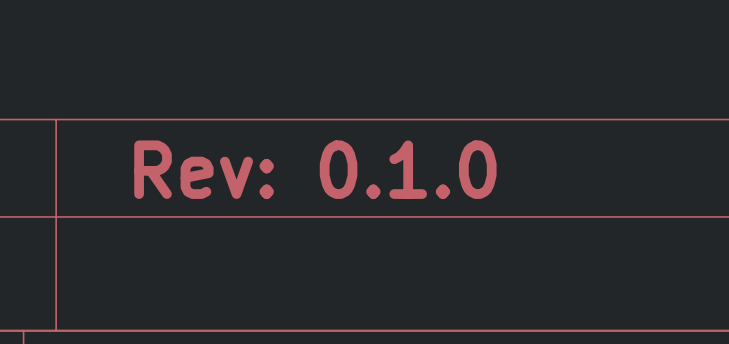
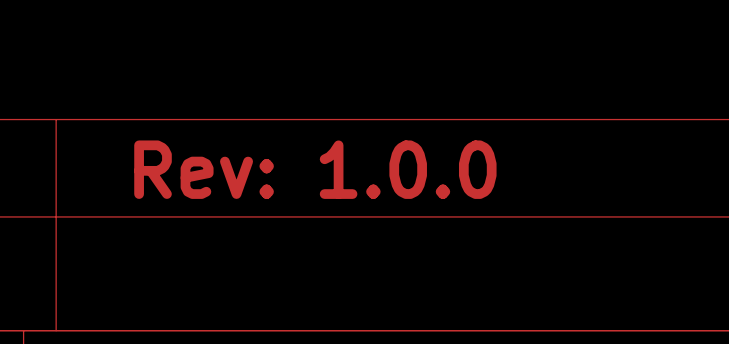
title block: Rev: 0.1.0 (315, 169) -> Rev: 1.0.0 (315, 169)

